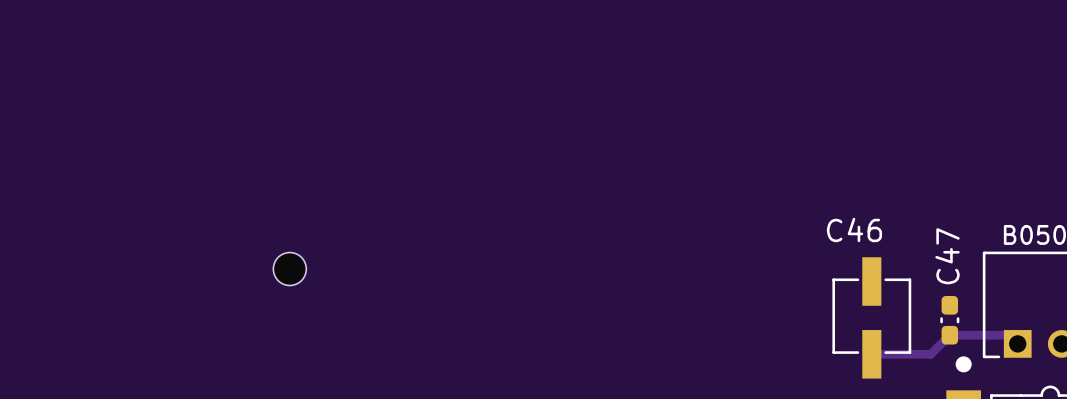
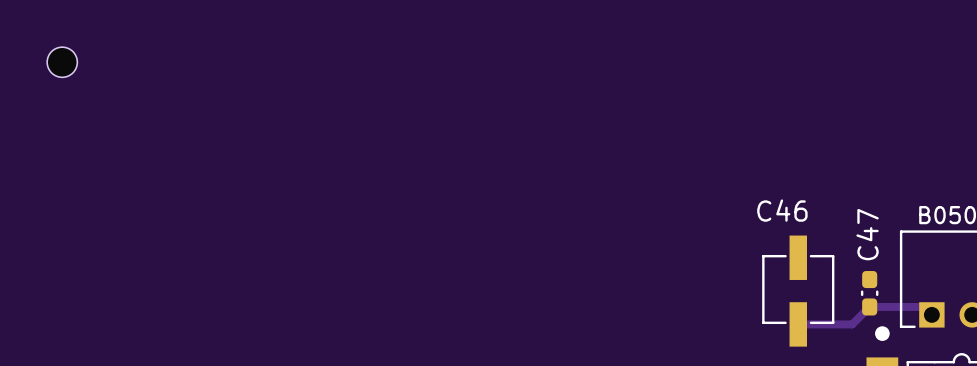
part position: (289, 269) -> (62, 62)

